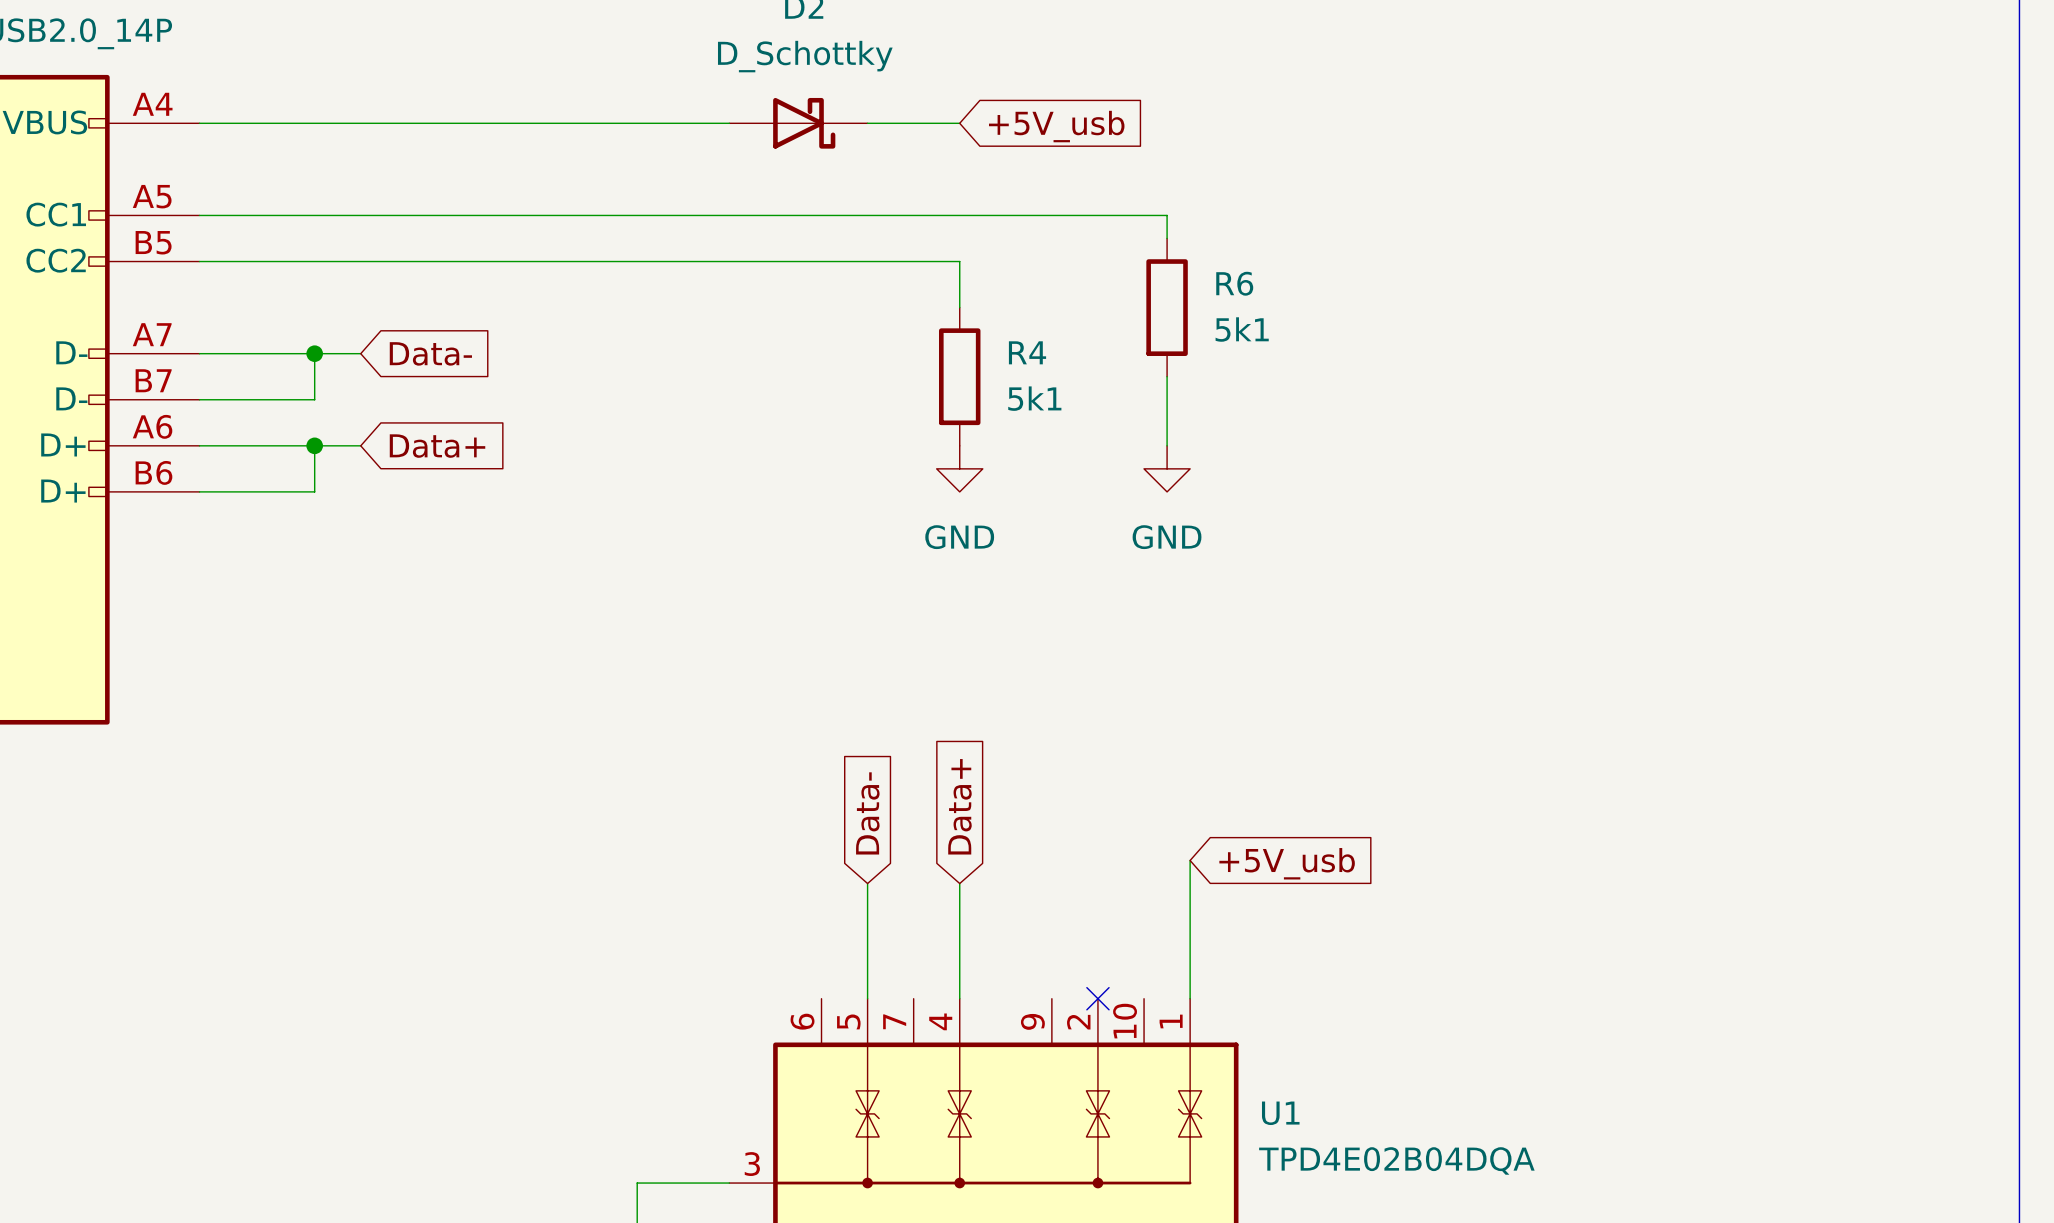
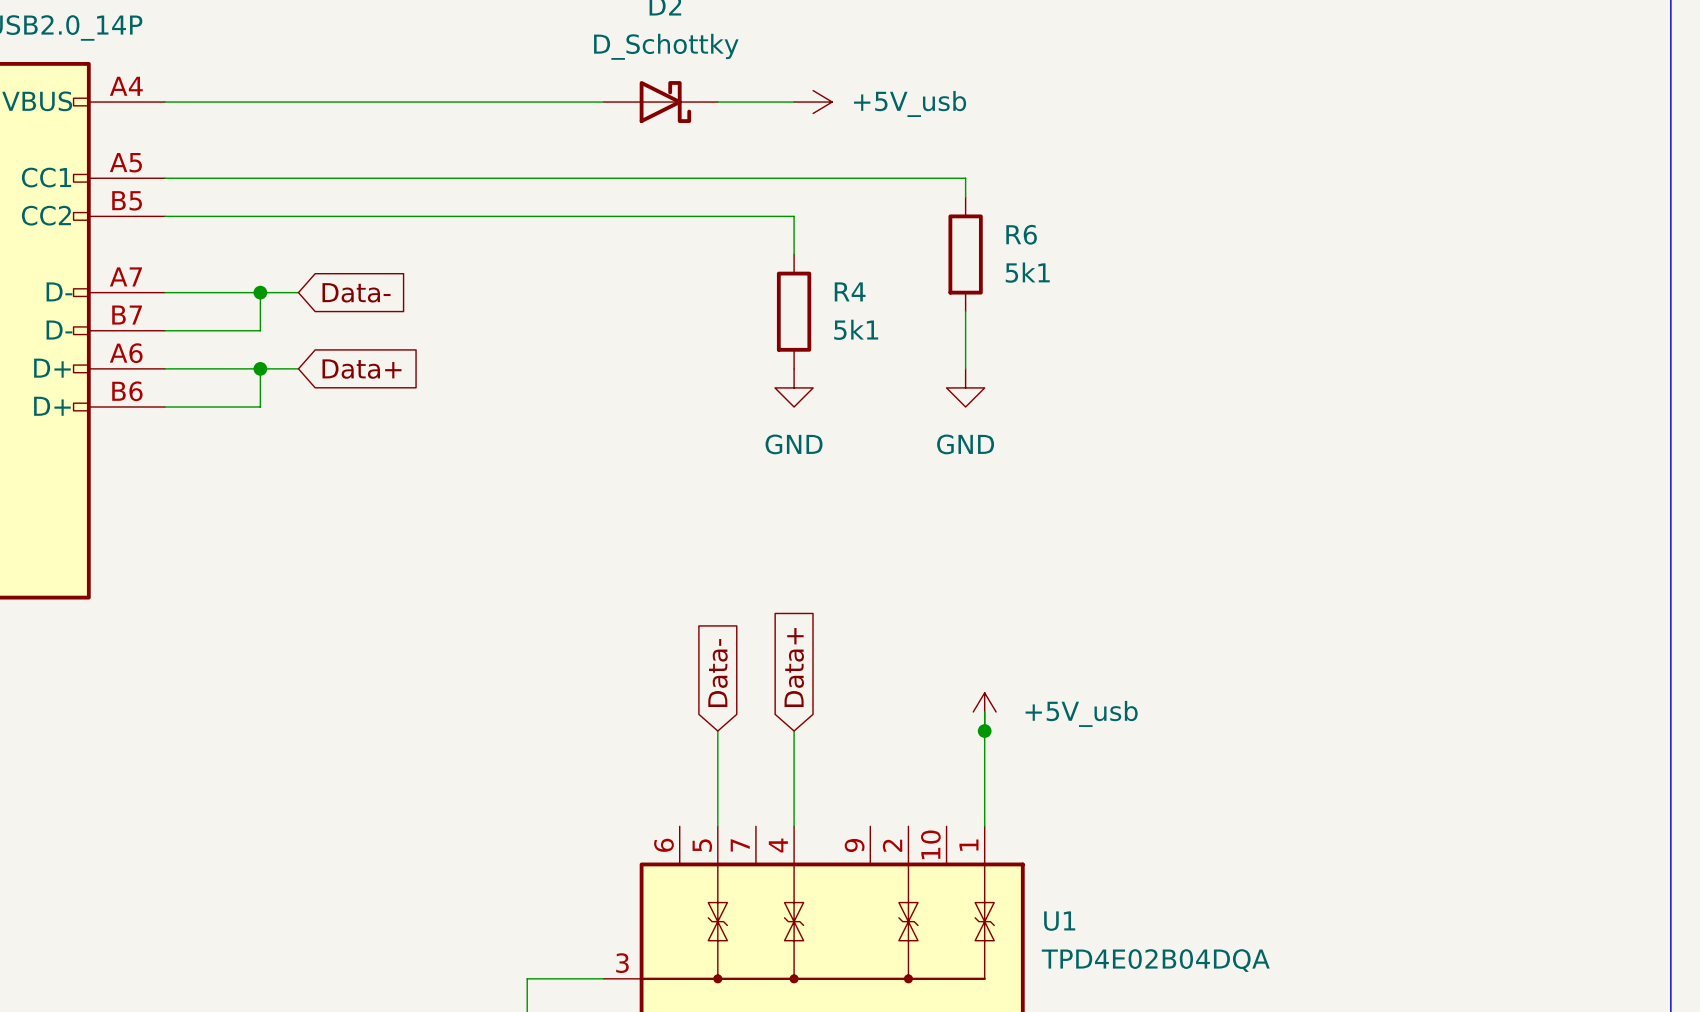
power symbol: none -> +5V_usb (813, 102)
global label: +5V_usb (1056, 126) -> none
power symbol: none -> +5V_usb (984, 711)
global label: +5V_usb (1287, 863) -> none
junction: none -> (984, 731)
no-connect mark: (1097, 998) -> none

